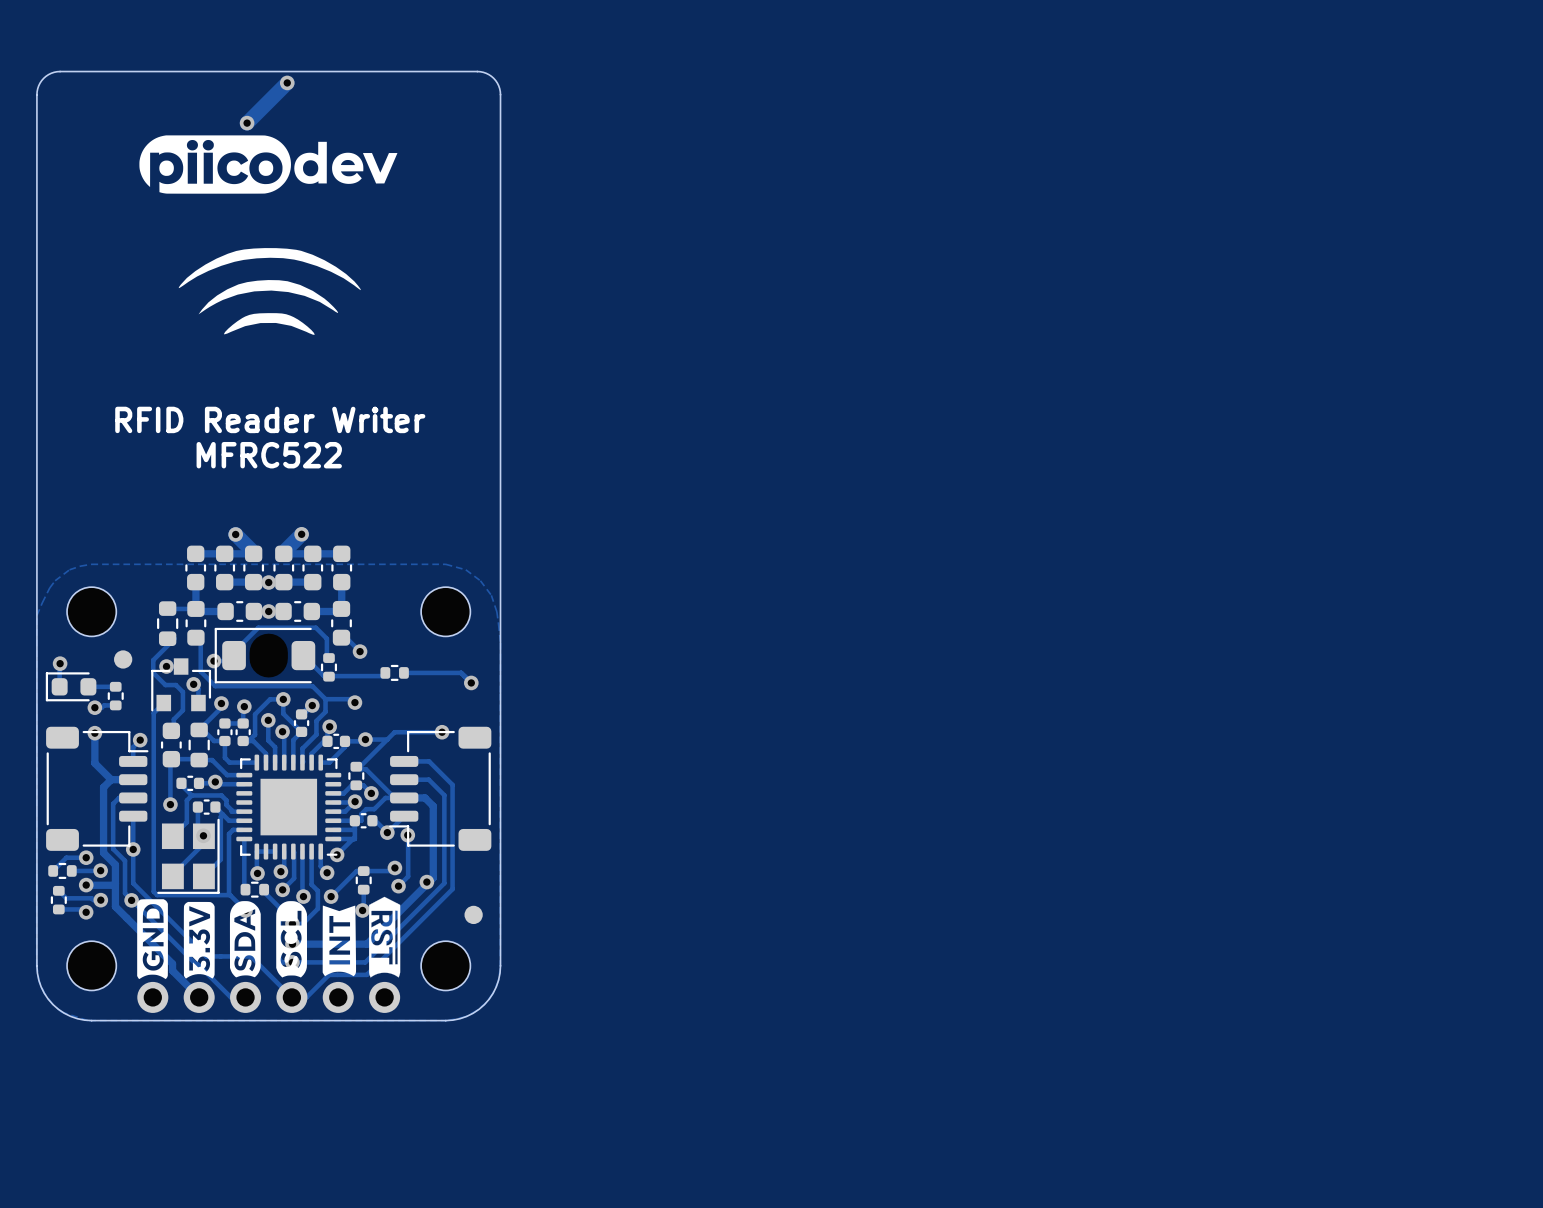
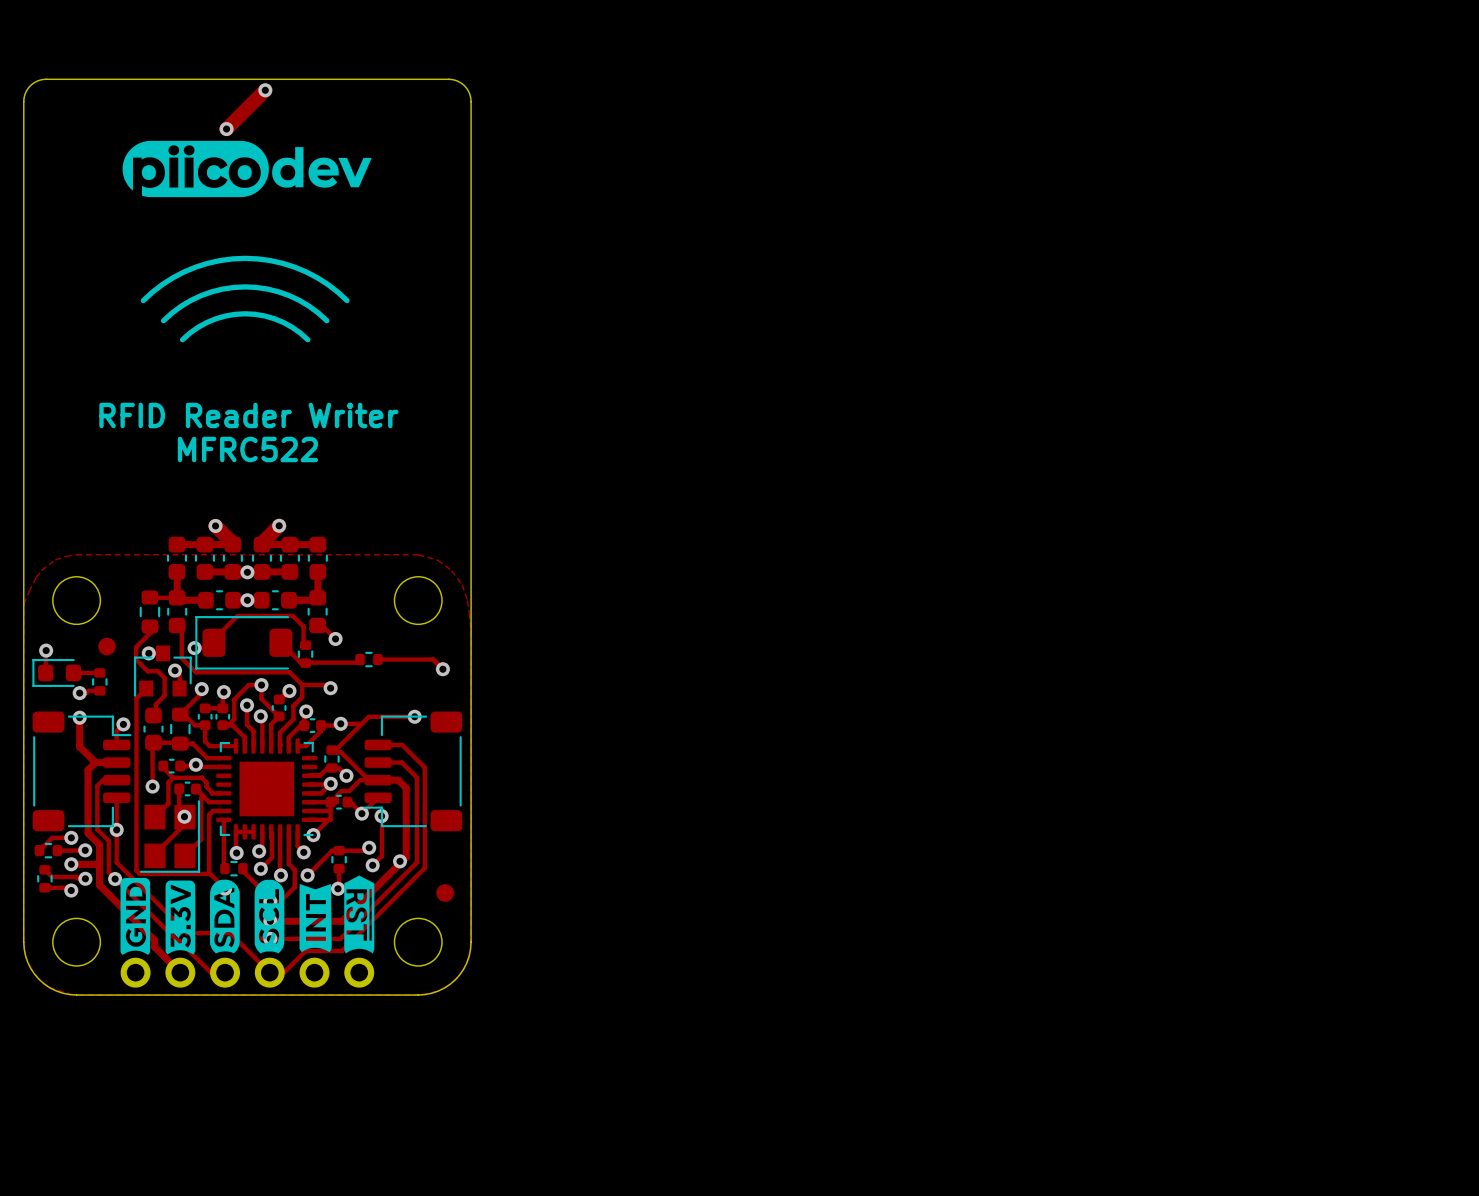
drawing: [178, 248, 362, 335] -> none
line: none -> (143, 300) (162, 284) (184, 271) (207, 263) (245, 258) (282, 263) (306, 271) (327, 284) (347, 300)
line: none -> (163, 320) (181, 306) (201, 295) (222, 289) (245, 286) (267, 289) (289, 295) (309, 306) (326, 320)
line: none -> (182, 339) (206, 322) (225, 316) (245, 313) (264, 316) (283, 322) (307, 339)

